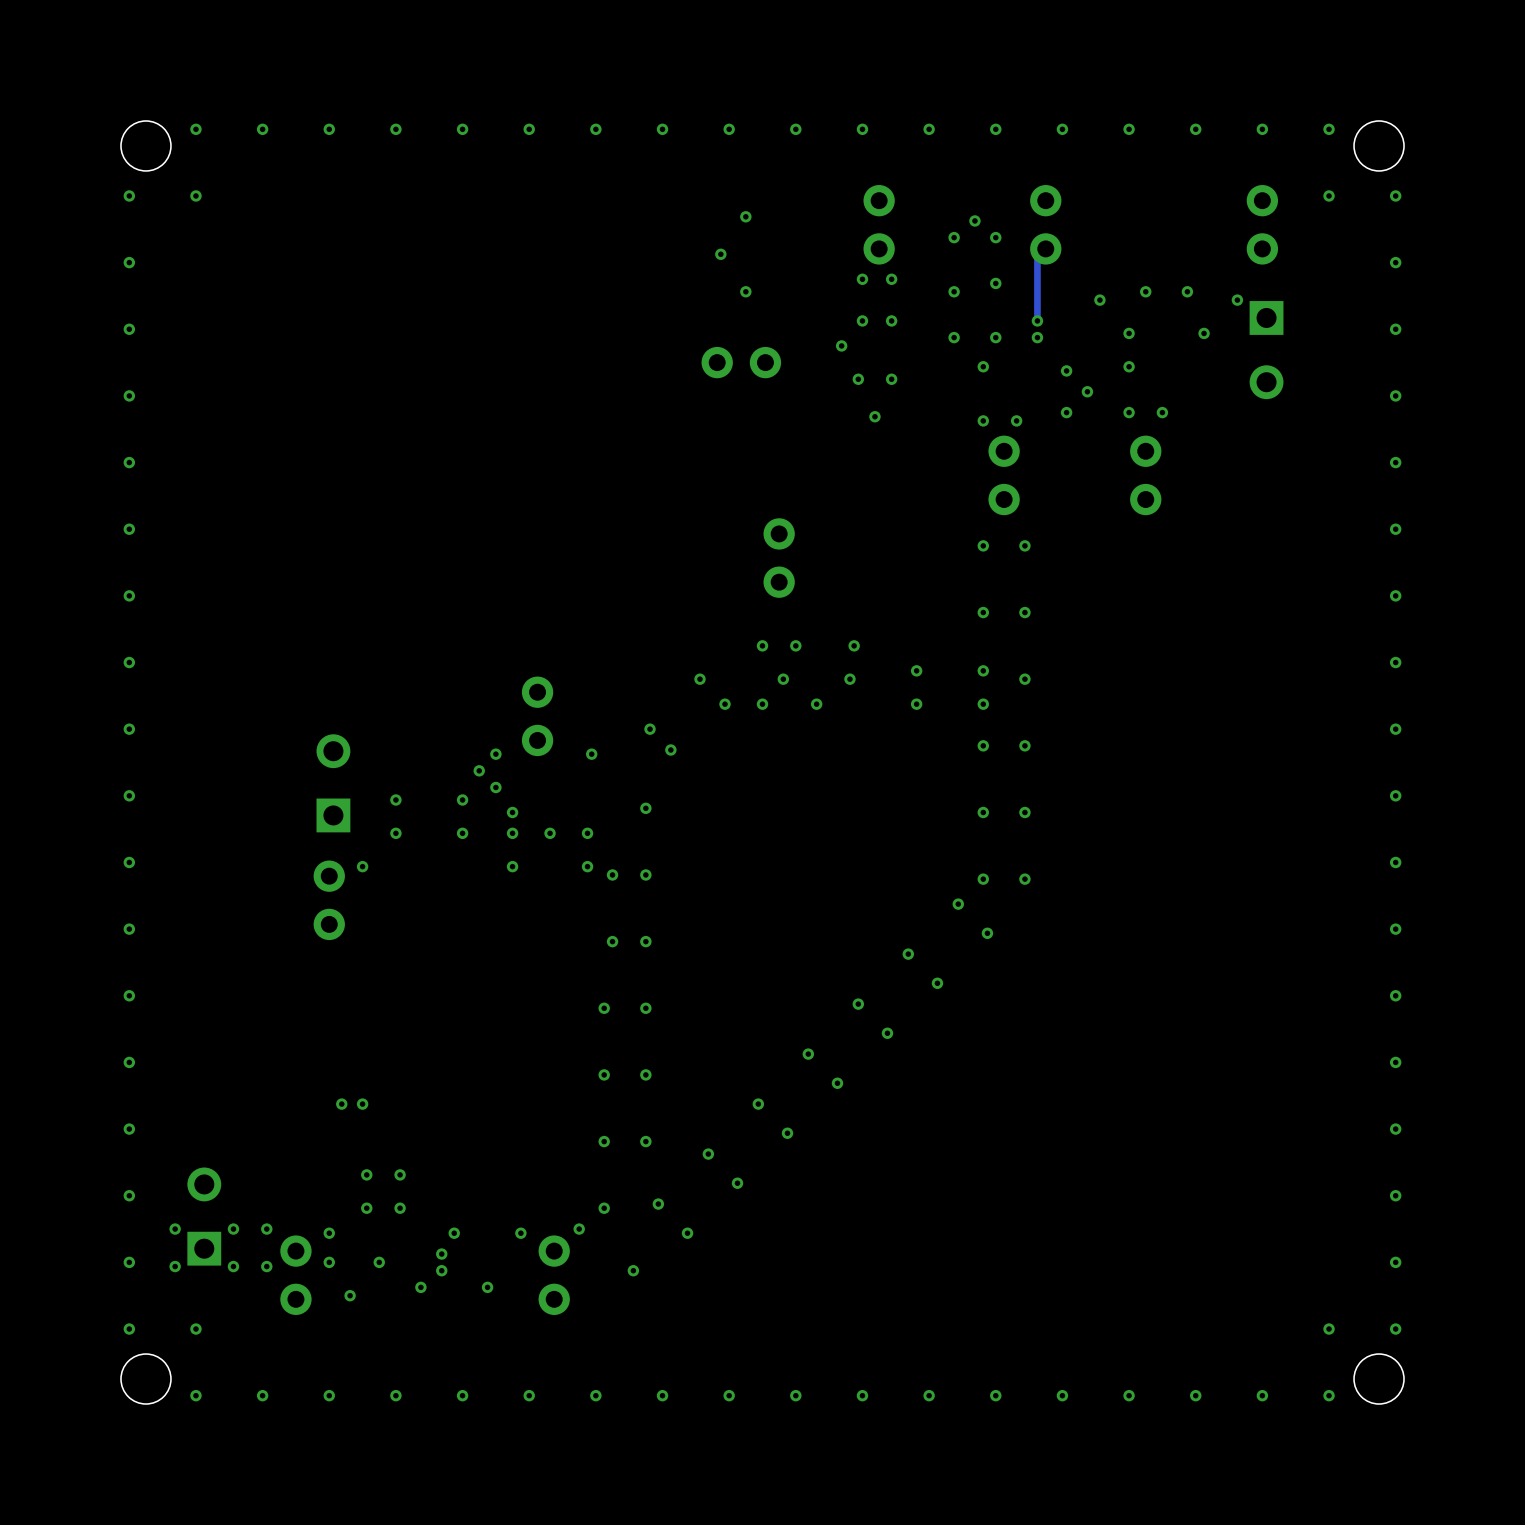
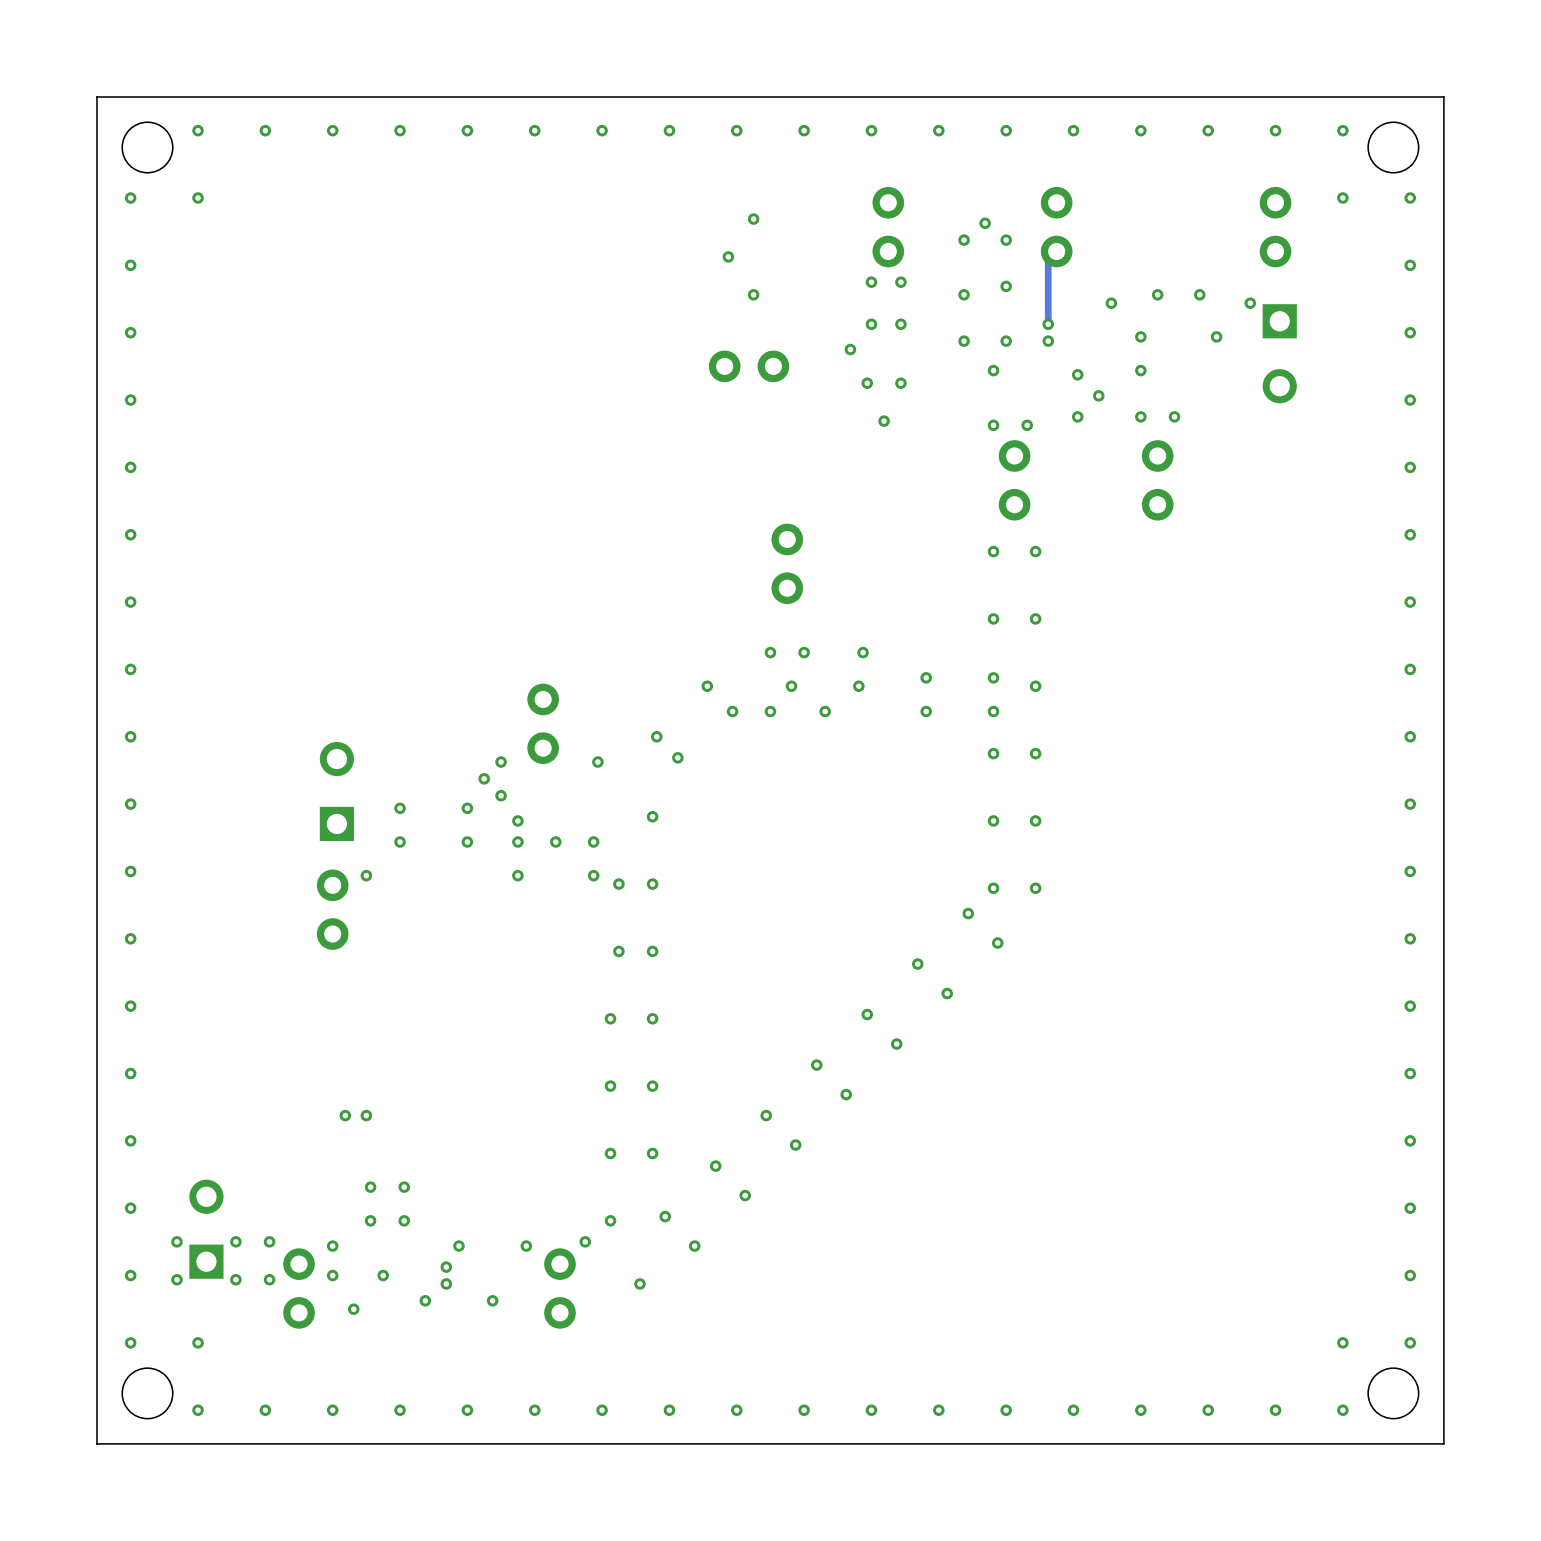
board edge: none -> (1443, 96) (96, 96) (96, 1443) (1443, 1443) (1443, 96)

